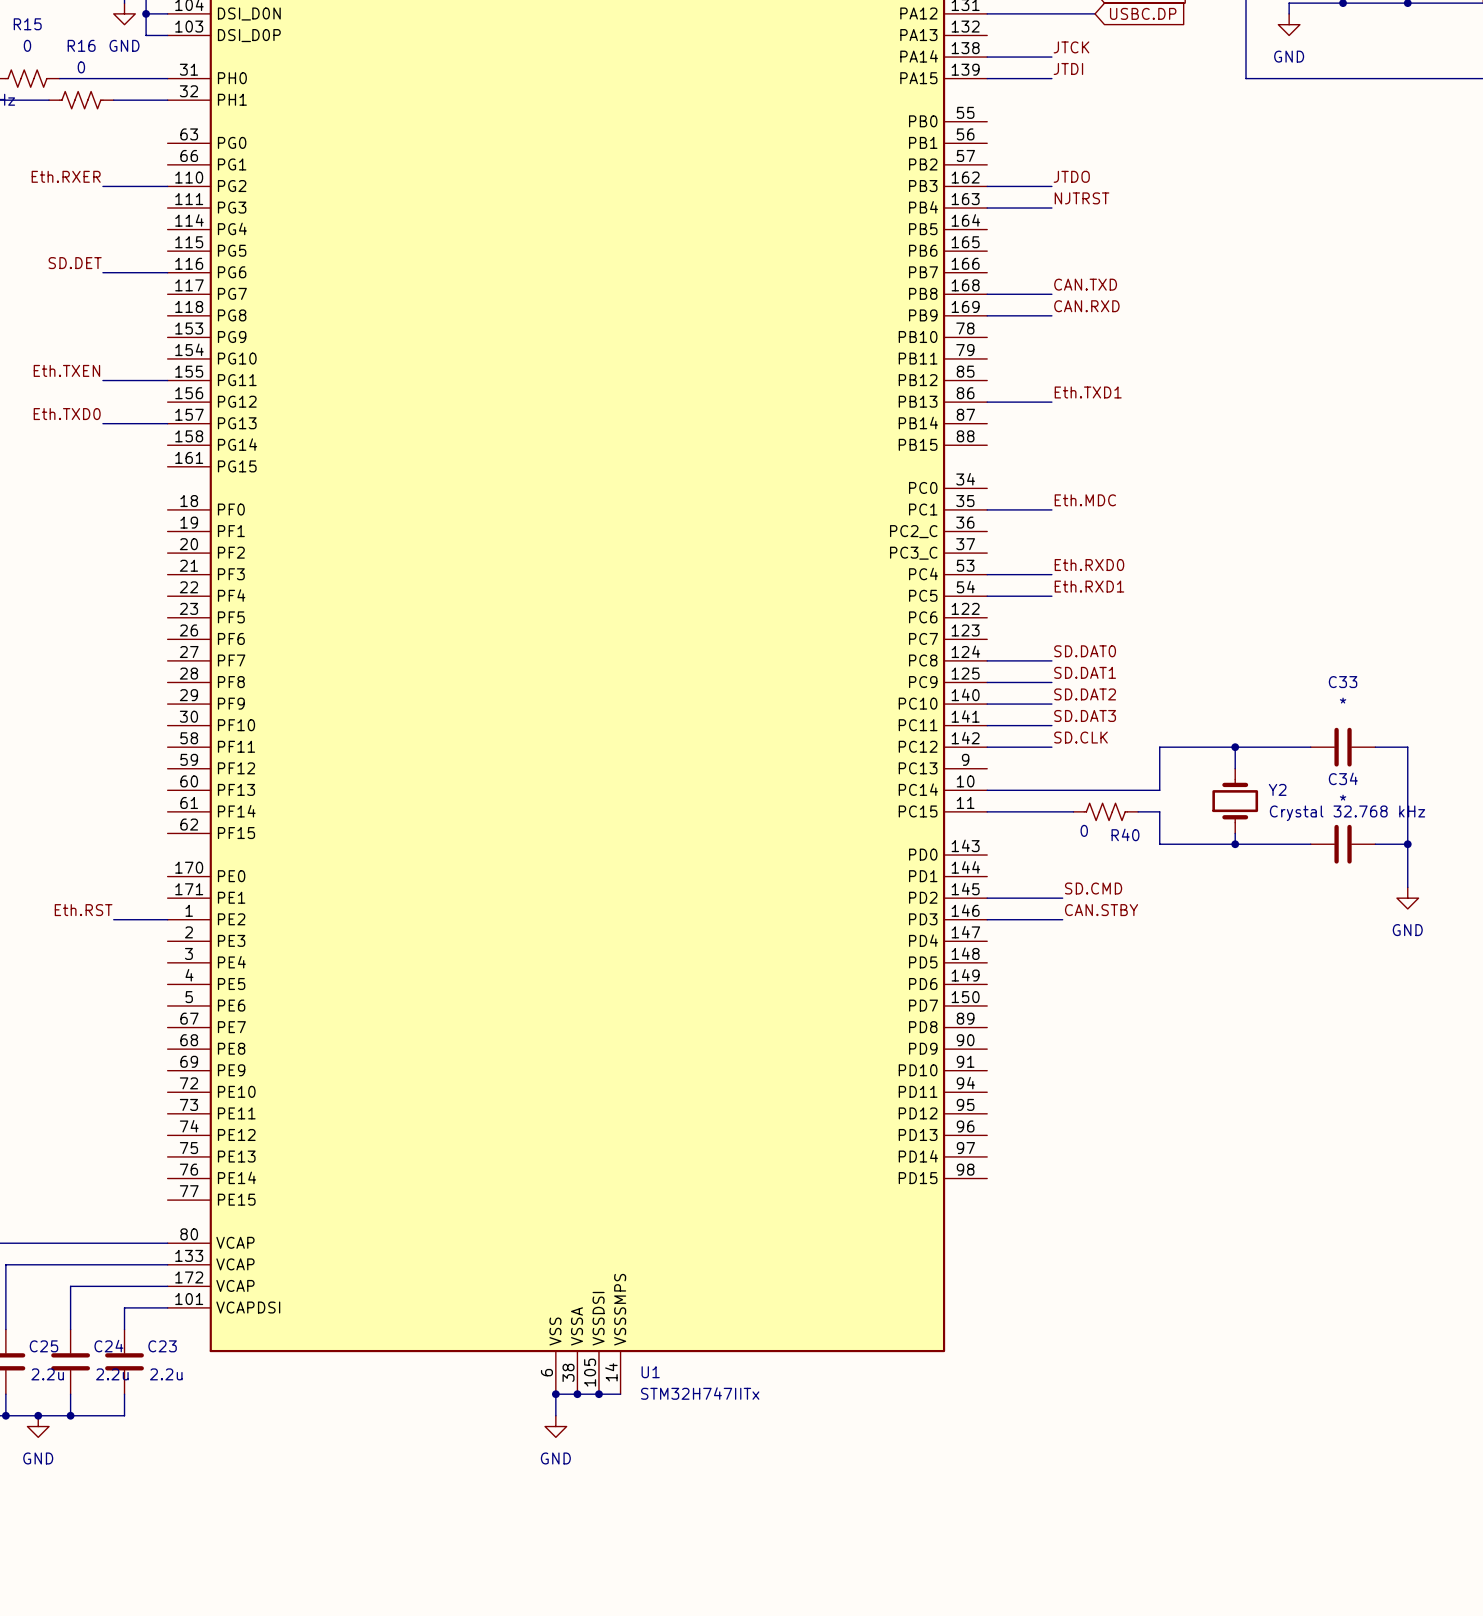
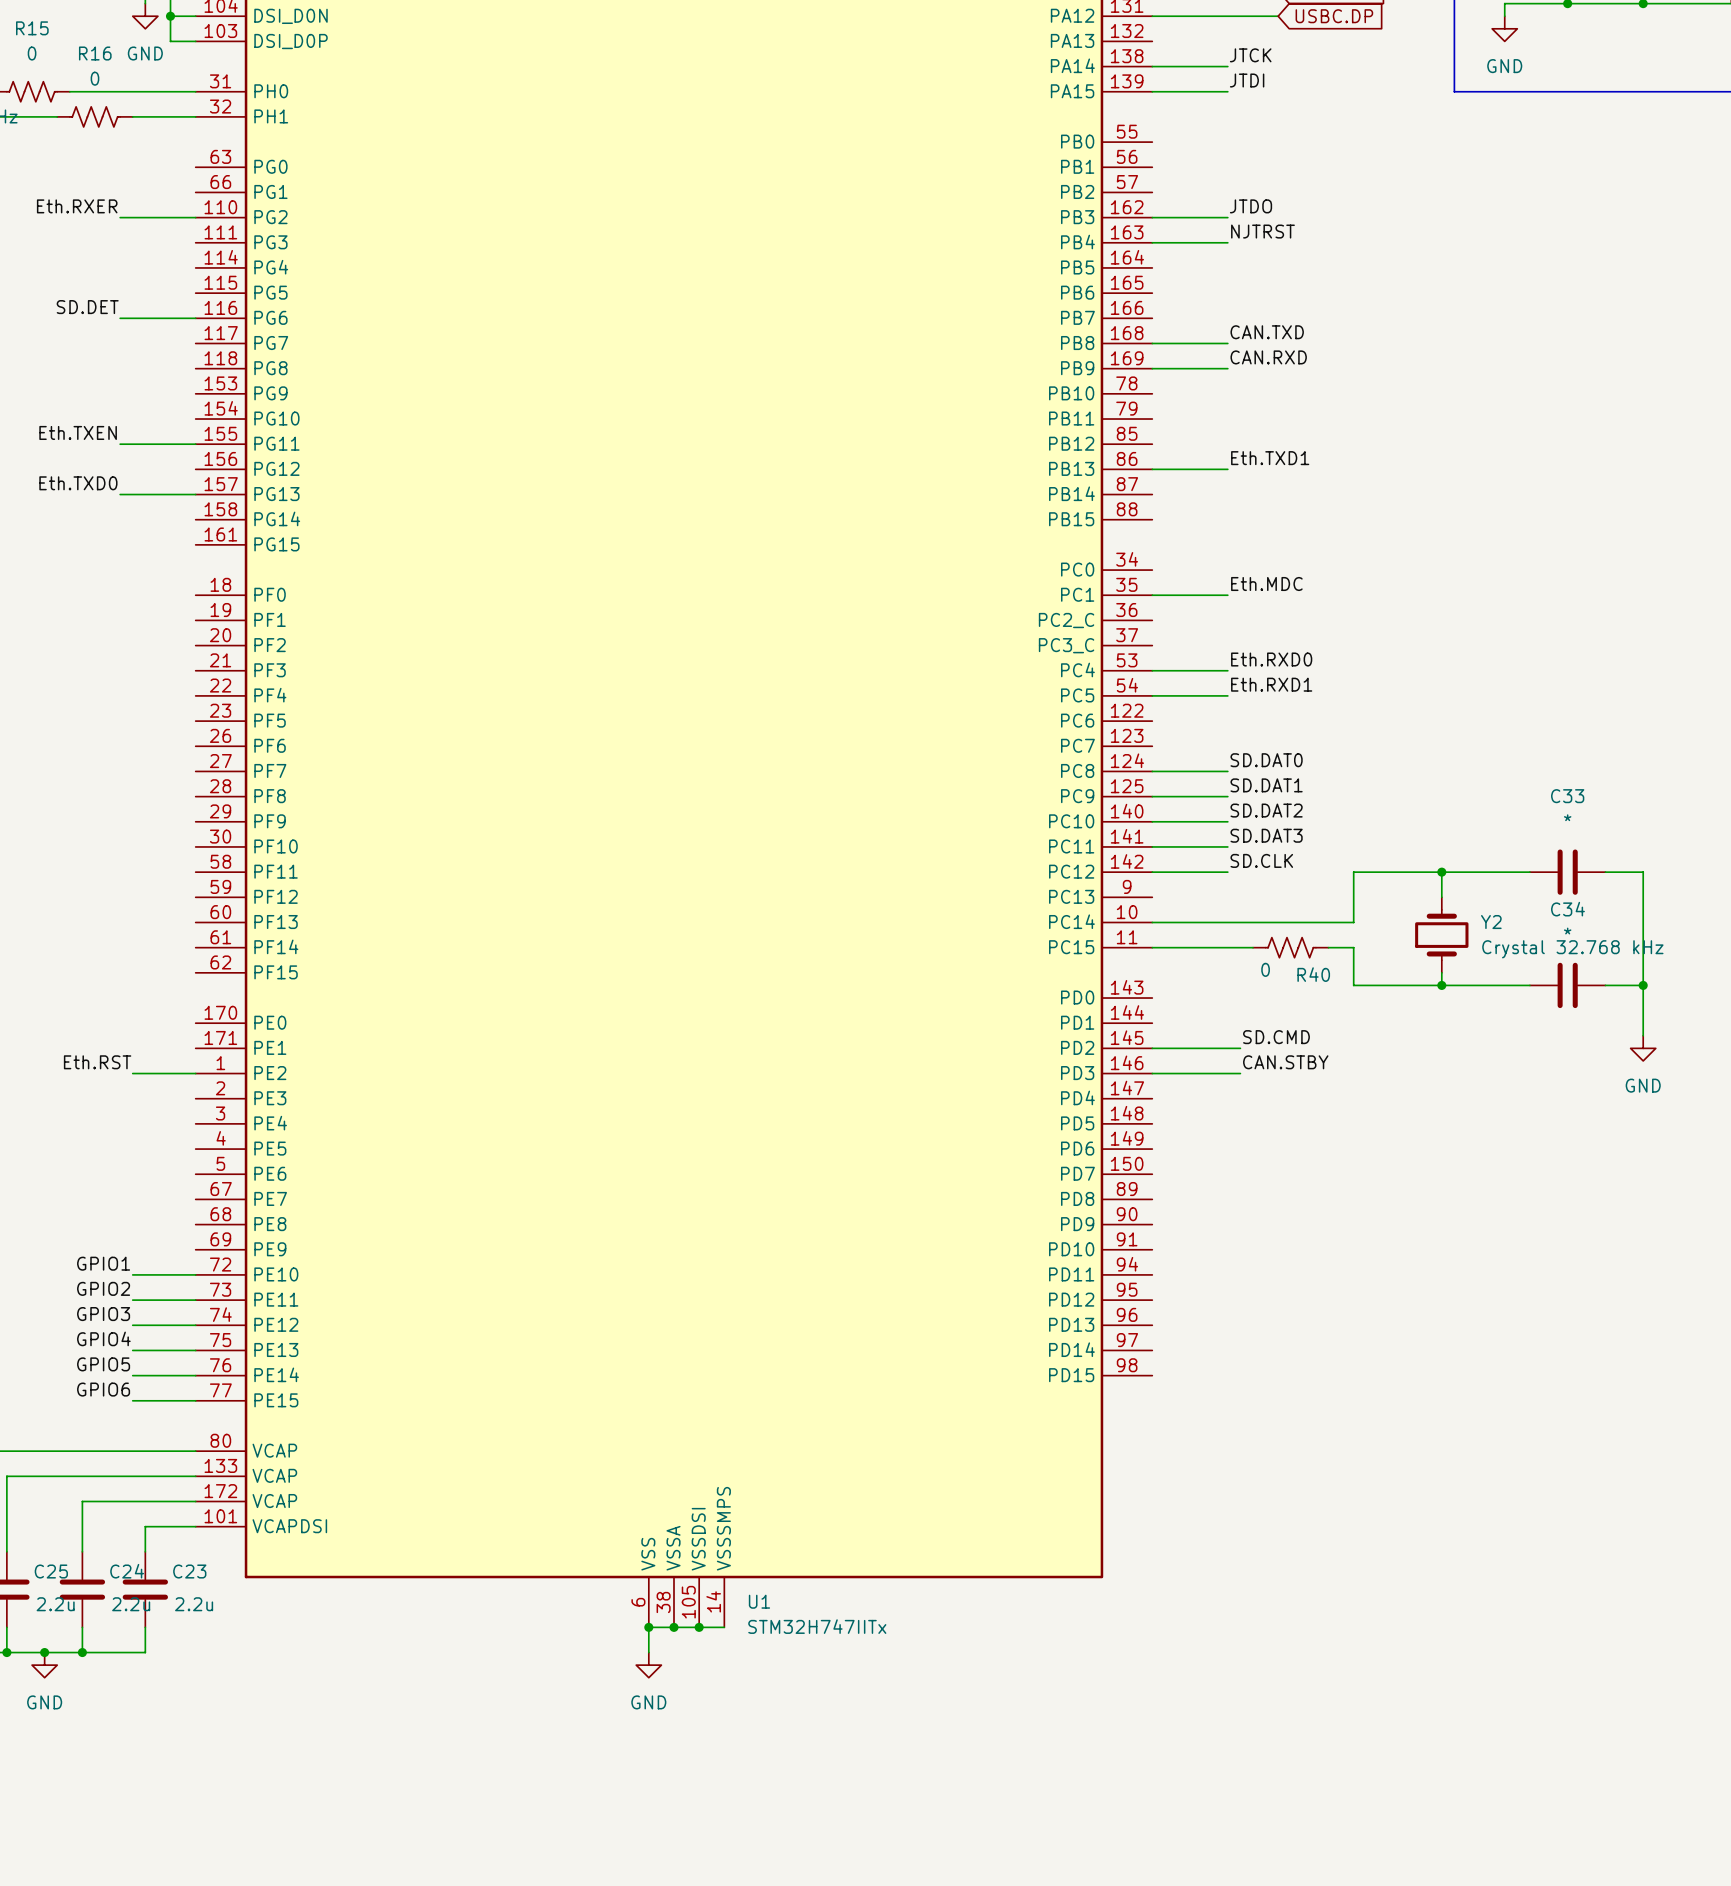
label: none -> GPIO1 (103, 1263)
wire: none -> (132, 1274) (195, 1274)
label: none -> GPIO2 (103, 1288)
wire: none -> (132, 1300) (195, 1300)
label: none -> GPIO3 (103, 1314)
wire: none -> (132, 1325) (195, 1325)
label: none -> GPIO4 (103, 1338)
wire: none -> (132, 1350) (195, 1350)
label: none -> GPIO5 (103, 1364)
wire: none -> (132, 1375) (195, 1375)
label: none -> GPIO6 (103, 1389)
wire: none -> (132, 1400) (195, 1400)

